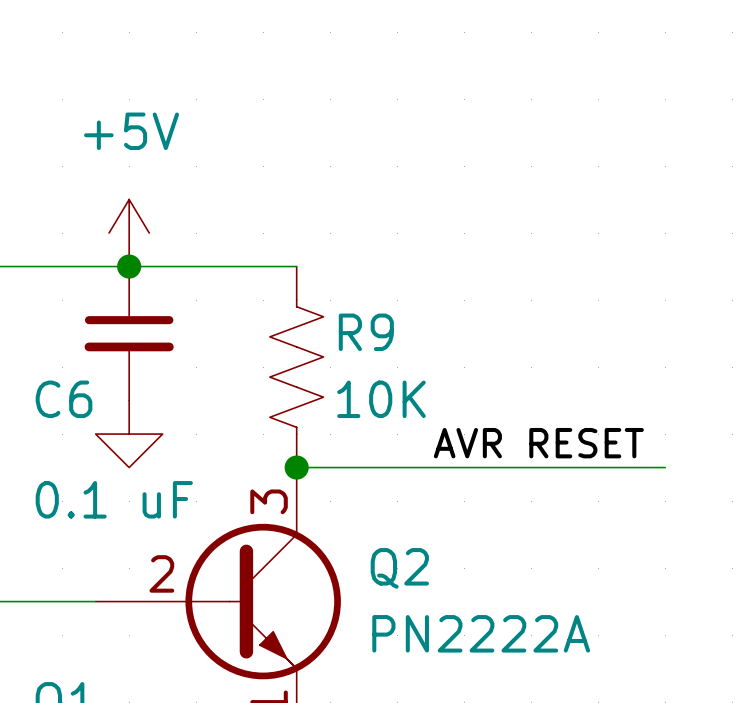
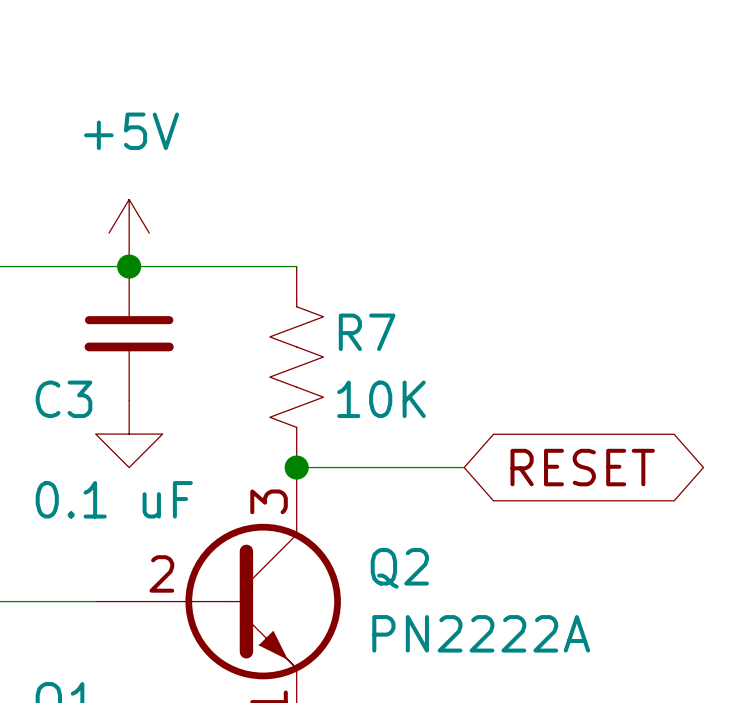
R9 name: R9 (366, 332) -> R7 (367, 332)
C6 name: C6 (64, 399) -> C3 (64, 399)
label: AVR RESET (538, 443) -> none
wire: (464, 467) (665, 467) -> none
global label: none -> RESET (582, 467)

